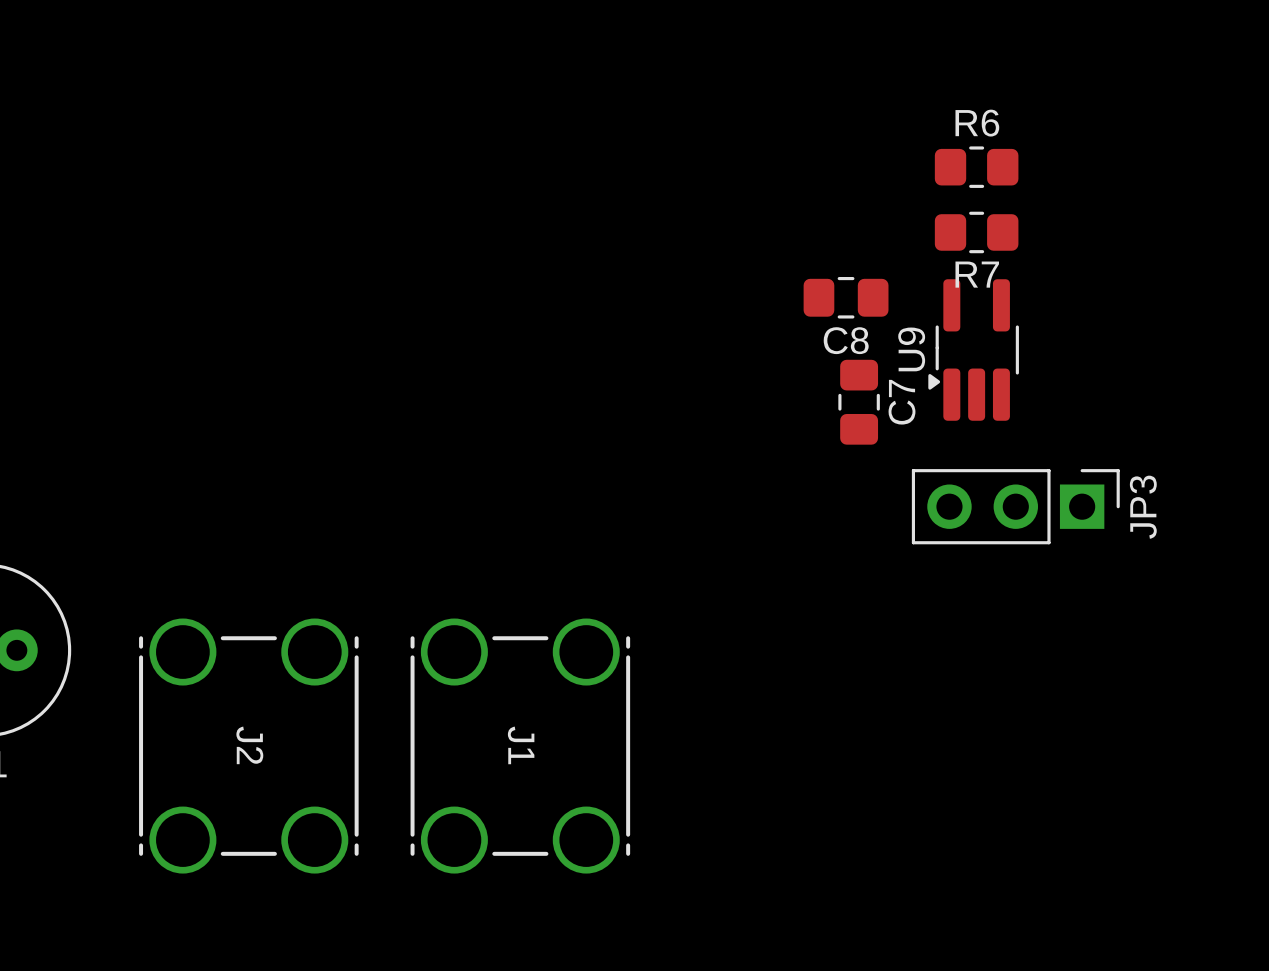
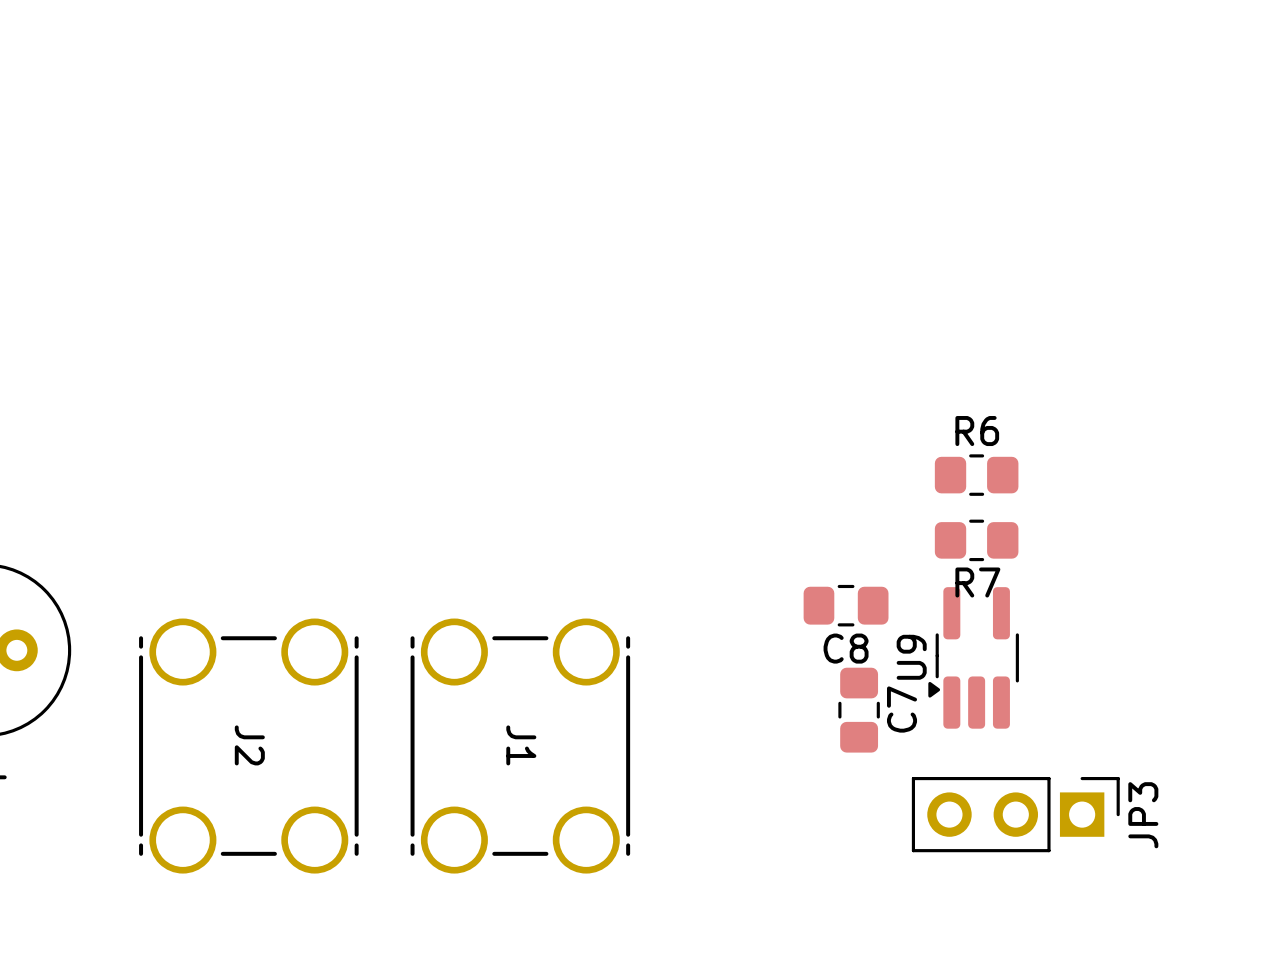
R6 position: (976, 167) -> (976, 475)
R7 position: (976, 232) -> (976, 540)
C8 position: (846, 297) -> (846, 605)
U9 position: (973, 349) -> (973, 657)
C7 position: (859, 402) -> (859, 710)
JP3 position: (1015, 506) -> (1015, 814)

